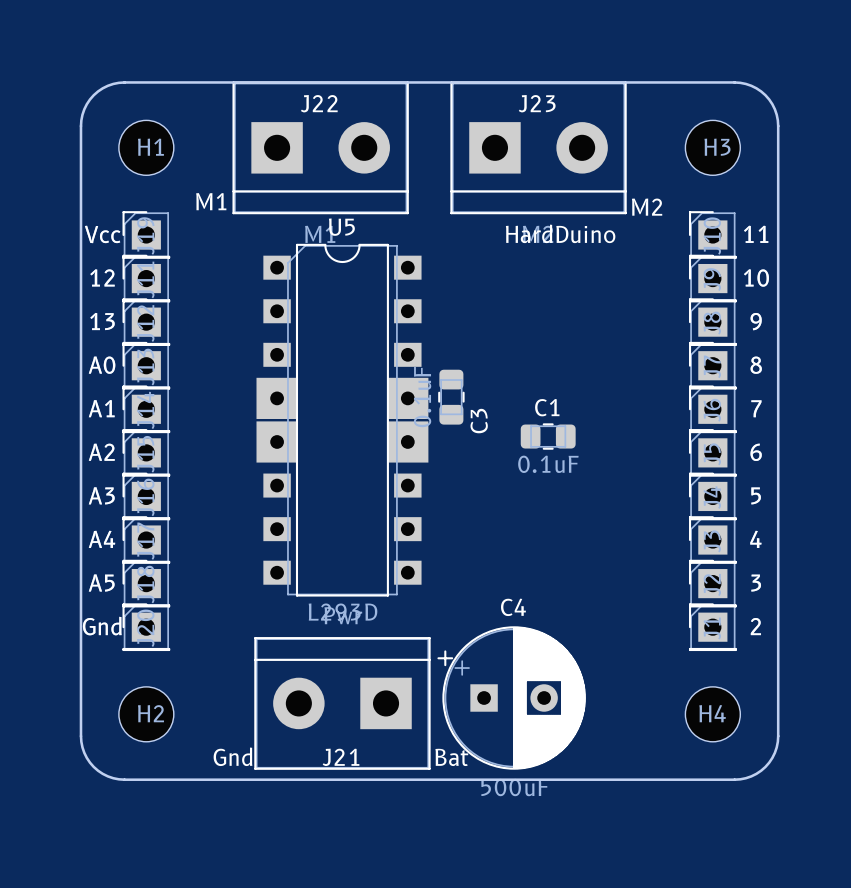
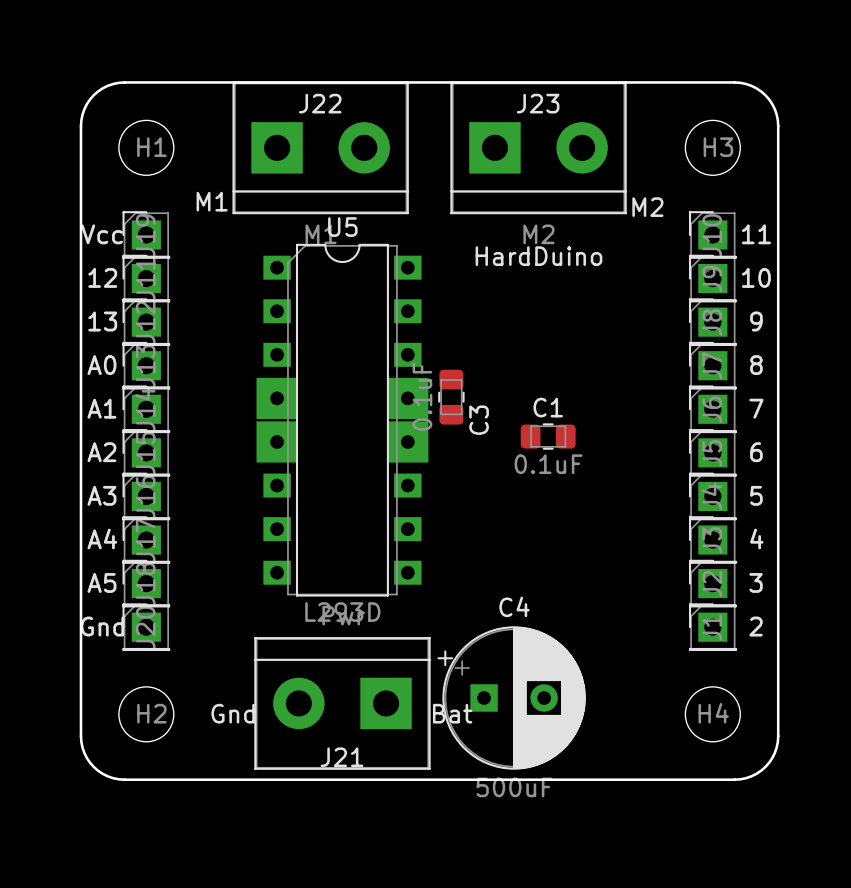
text position: HardDuino (560, 233) -> HardDuino (538, 256)
text position: Gnd (232, 756) -> Gnd (233, 713)
text position: Bat (451, 757) -> Bat (452, 713)

